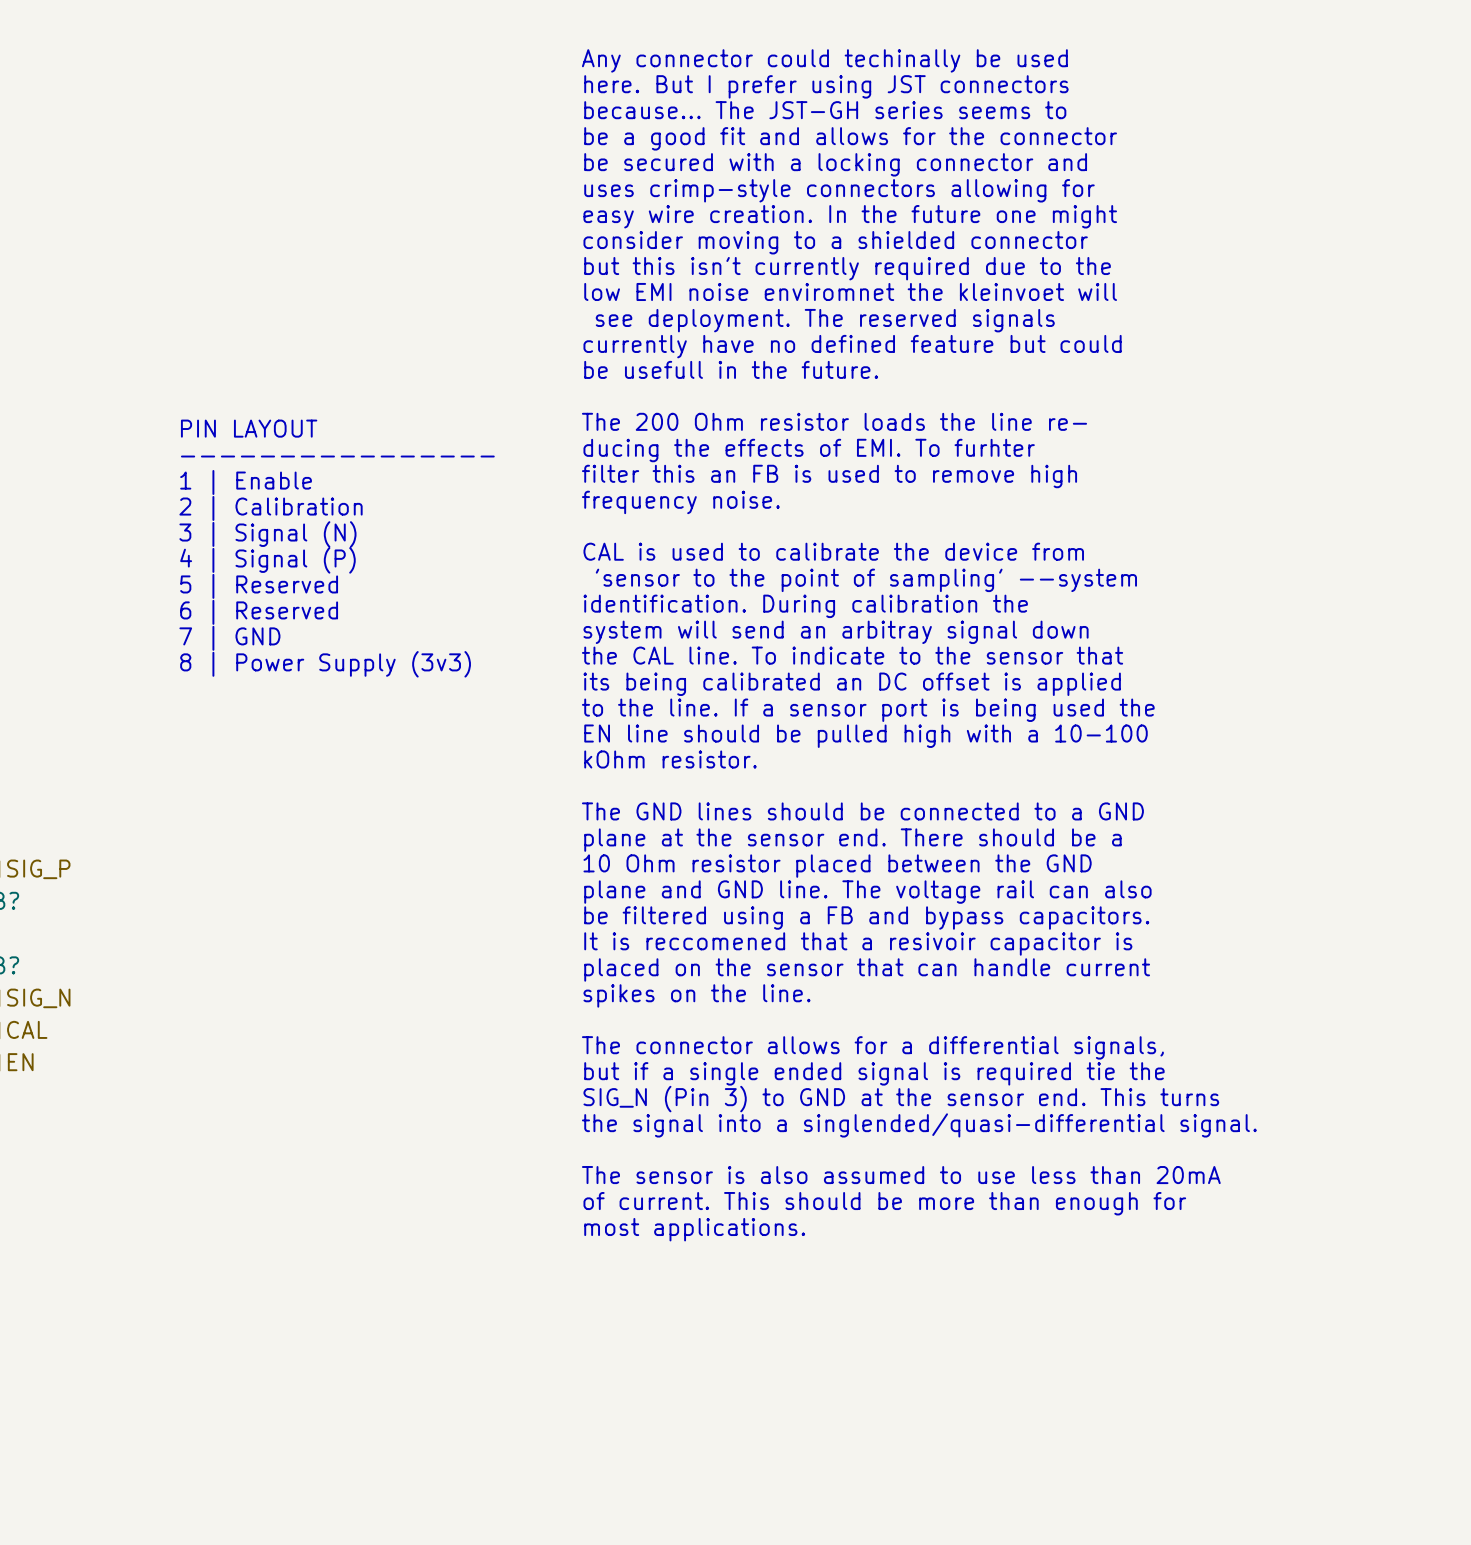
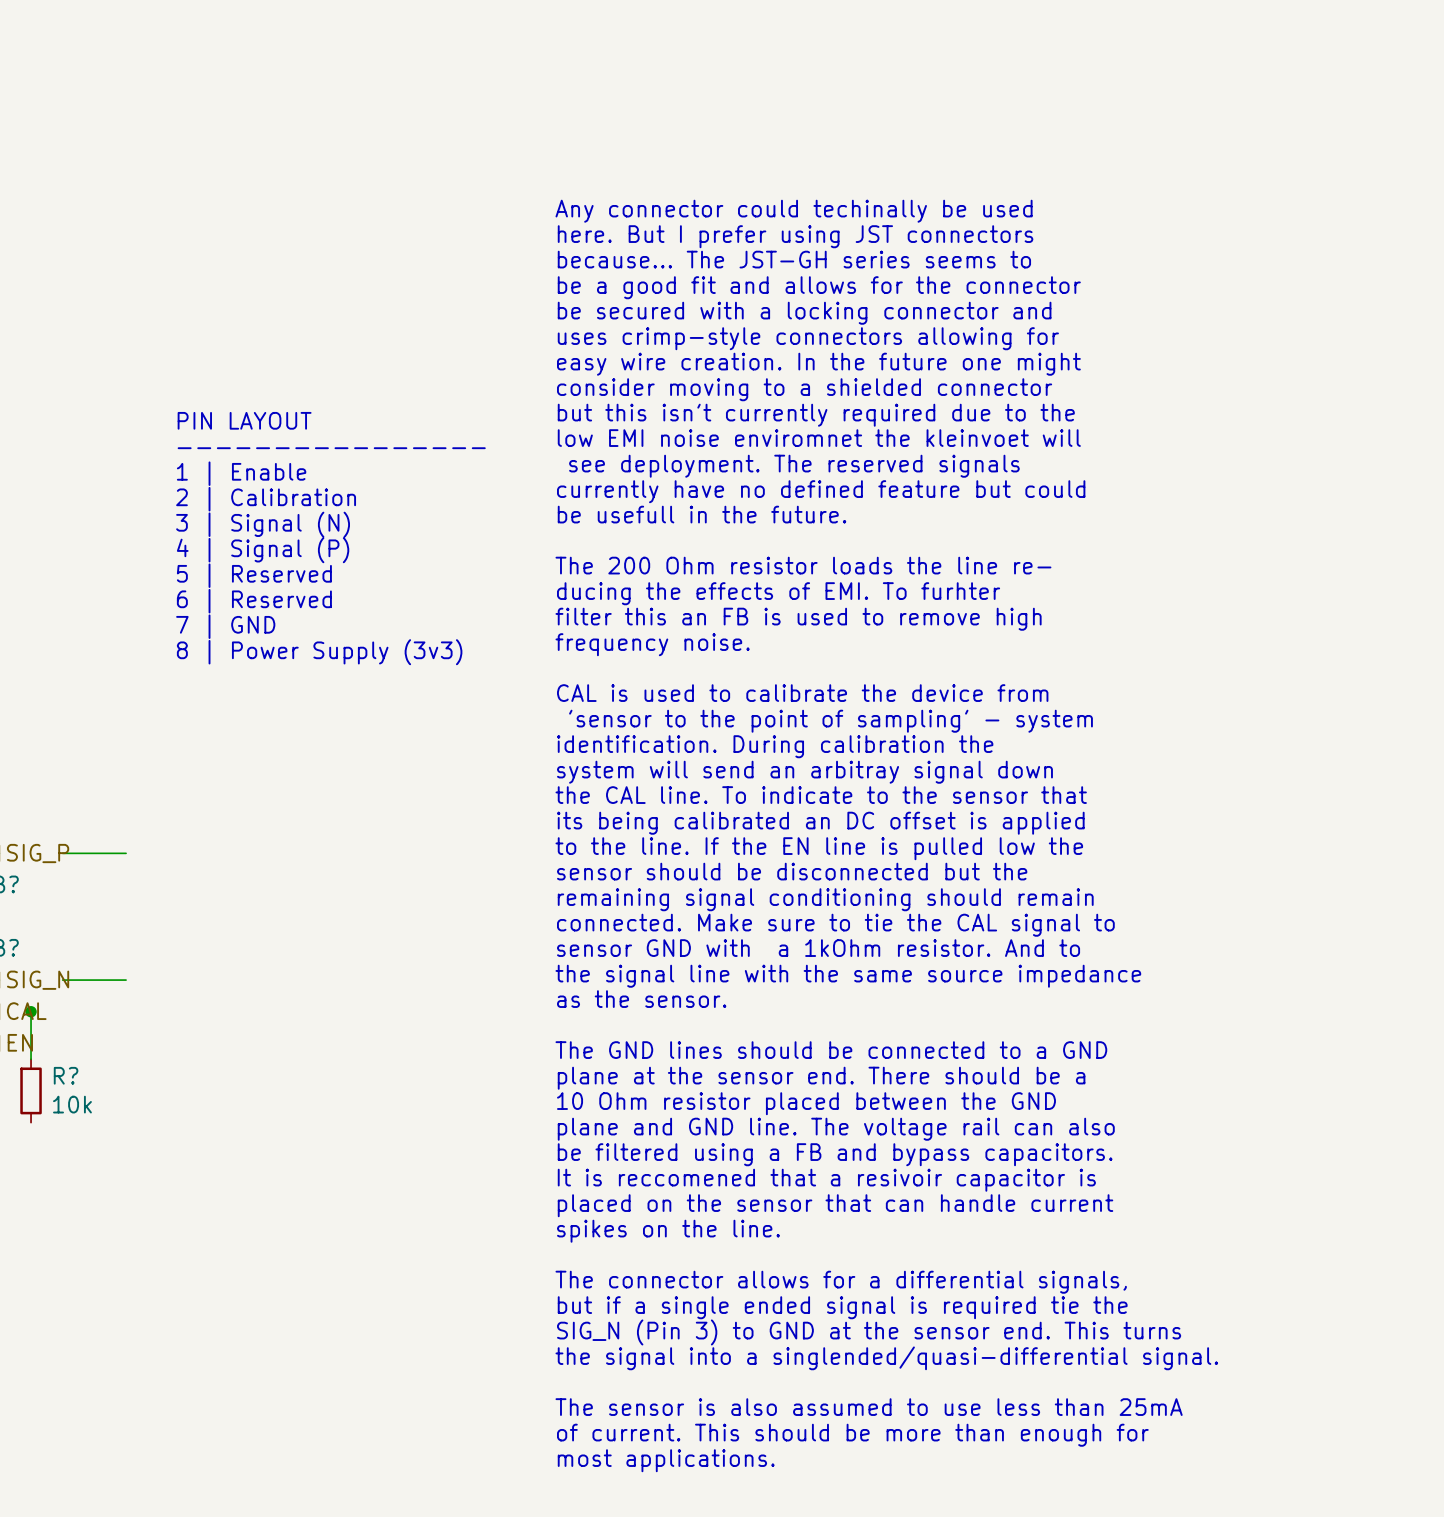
text position: Any connector could techinally be used (824, 60) -> Any connector could techinally be used (794, 211)
text position: here. But I prefer using JST connectors (826, 86) -> here. But I prefer using JST connectors (795, 236)
text position: because... The JST-GH series seems to (825, 110) -> because... The JST-GH series seems to (794, 259)
text position: be a good fit and allows for the connector (850, 138) -> be a good fit and allows for the connector (819, 287)
text position: be secured with a locking connector and (835, 164) -> be secured with a locking connector and (804, 313)
text position: uses crimp-style connectors allowing for (839, 190) -> uses crimp-style connectors allowing for (808, 338)
text position: easy wire creation. In the future one might (850, 216) -> easy wire creation. In the future one might (818, 364)
text position: consider moving to a shielded connector (835, 242) -> consider moving to a shielded connector (804, 389)
text position: but this isn't currently required due to the (847, 268) -> but this isn't currently required due to the (816, 415)
text position: low EMI noise enviromnet the kleinvoet will (850, 291) -> low EMI noise enviromnet the kleinvoet will (819, 438)
text position: see deployment. The reserved signals (825, 320) -> see deployment. The reserved signals (794, 466)
text position: currently have no defined feature but could (852, 346) -> currently have no defined feature but could (821, 491)
text position: be usefull in the future. (731, 369) -> be usefull in the future. (702, 514)
text position: The 200 Ohm resistor loads the line re- (834, 421) -> The 200 Ohm resistor loads the line re- (803, 565)
text position: ducing the effects of EMI. To furhter (809, 450) -> ducing the effects of EMI. To furhter (778, 593)
text position: filter this an FB is used to remove high (829, 476) -> filter this an FB is used to remove high (798, 619)
text position: frequency noise. (680, 502) -> frequency noise. (652, 644)
text position: CAL is used to calibrate the device from (833, 551) -> CAL is used to calibrate the device from (802, 693)
text: 'sensor to the point of sampling' --system (866, 580) -> none
text position: identification. During calibration the (805, 606) -> identification. During calibration the (775, 746)
text position: system will send an arbitray signal down (836, 632) -> system will send an arbitray signal down (804, 772)
text position: the CAL line. To indicate to the sensor that (852, 655) -> the CAL line. To indicate to the sensor that (821, 795)
text position: its being calibrated an DC offset is applied (852, 684) -> its being calibrated an DC offset is applied (820, 823)
text: to the line. If a sensor port is being used the (868, 710) -> none
text: none -> 'sensor to the point of sampling' - system (830, 721)
text: EN line should be pulled high with a 10-100 (865, 736) -> none
text: kOhm resistor. (670, 759) -> none
text position: The GND lines should be connected to a GND (862, 811) -> The GND lines should be connected to a GND (831, 1050)
text position: plane at the sensor end. There should be a (852, 840) -> plane at the sensor end. There should be a (821, 1078)
text: none -> to the line. If the EN line is pulled low the (819, 848)
text position: 10 Ohm resistor placed between the GND (837, 866) -> 10 Ohm resistor placed between the GND (806, 1103)
wire: none -> (62, 853) (126, 853)
text: none -> sensor should be disconnected but the (792, 871)
text position: plane and GND line. The voltage rail can also (867, 892) -> plane and GND line. The voltage rail can also (836, 1129)
text: none -> remaining signal conditioning should remain (825, 899)
text position: be filtered using a FB and bypass capacitors. (866, 918) -> be filtered using a FB and bypass capacitors. (835, 1154)
text: none -> connected. Make sure to tie the CAL signal to (835, 925)
text position: It is reccomened that a resivoir capacitor is (858, 943) -> It is reccomened that a resivoir capacitor is (826, 1180)
text: none -> sensor GND with a 1kOhm resistor. And to (818, 948)
text position: placed on the sensor that can handle current (867, 969) -> placed on the sensor that can handle current (835, 1205)
text: none -> the signal line with the same source impedance (848, 976)
text position: spikes on the line. (696, 995) -> spikes on the line. (668, 1231)
wire: none -> (62, 980) (126, 980)
text: none -> as the sensor. (641, 999)
wire: none -> (31, 1011) (31, 1059)
junction: none -> (31, 1011)
text position: The connector allows for a differential signals, (872, 1047) -> The connector allows for a differential signals, (841, 1282)
text position: but if a single ended signal is required tie the (874, 1073) -> but if a single ended signal is required tie the (842, 1307)
text position: SIG_N (Pin 3) to GND at the sensor end. This turns (901, 1099) -> SIG_N (Pin 3) to GND at the sensor end. This turns (869, 1332)
R?: none -> 10k (31, 1090)
text position: the signal into a singlended/quasi-differential signal. (919, 1125) -> the signal into a singlended/quasi-differential signal. (886, 1358)
text: The sensor is also assumed to use less than 20mA (901, 1175) -> none
text position: of current. This should be more than enough for (884, 1203) -> of current. This should be more than enough for (852, 1435)
text position: most applications. (694, 1229) -> most applications. (666, 1460)
text: none -> The sensor is also assumed to use less than 25mA (869, 1407)

